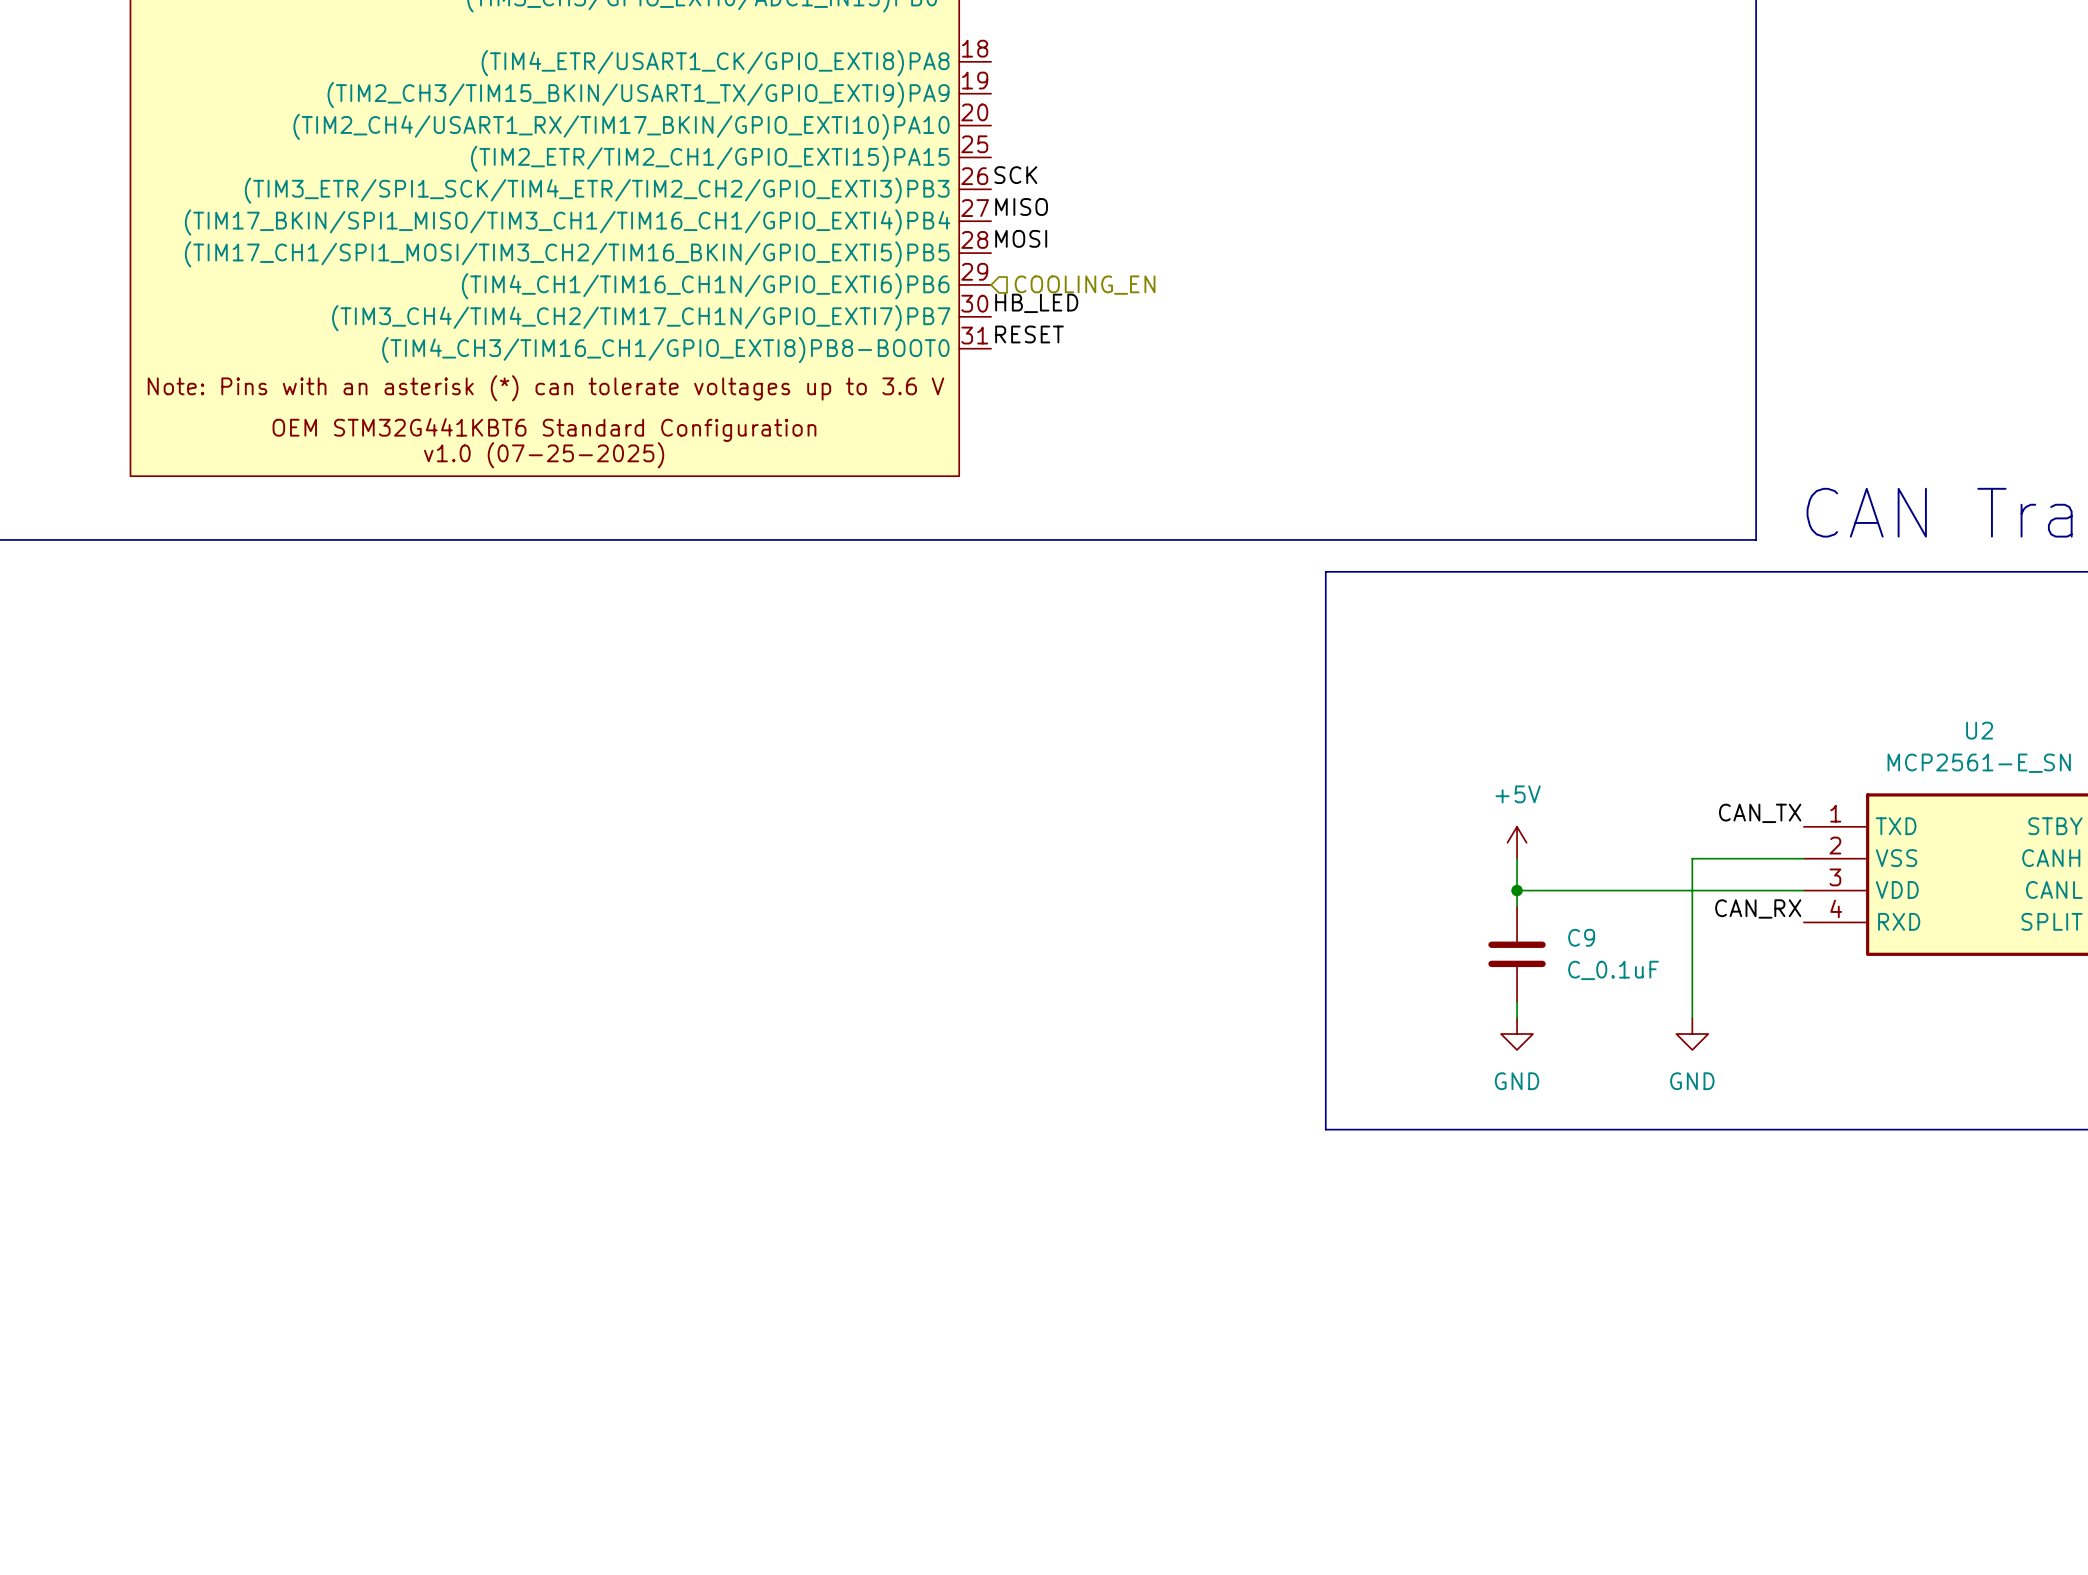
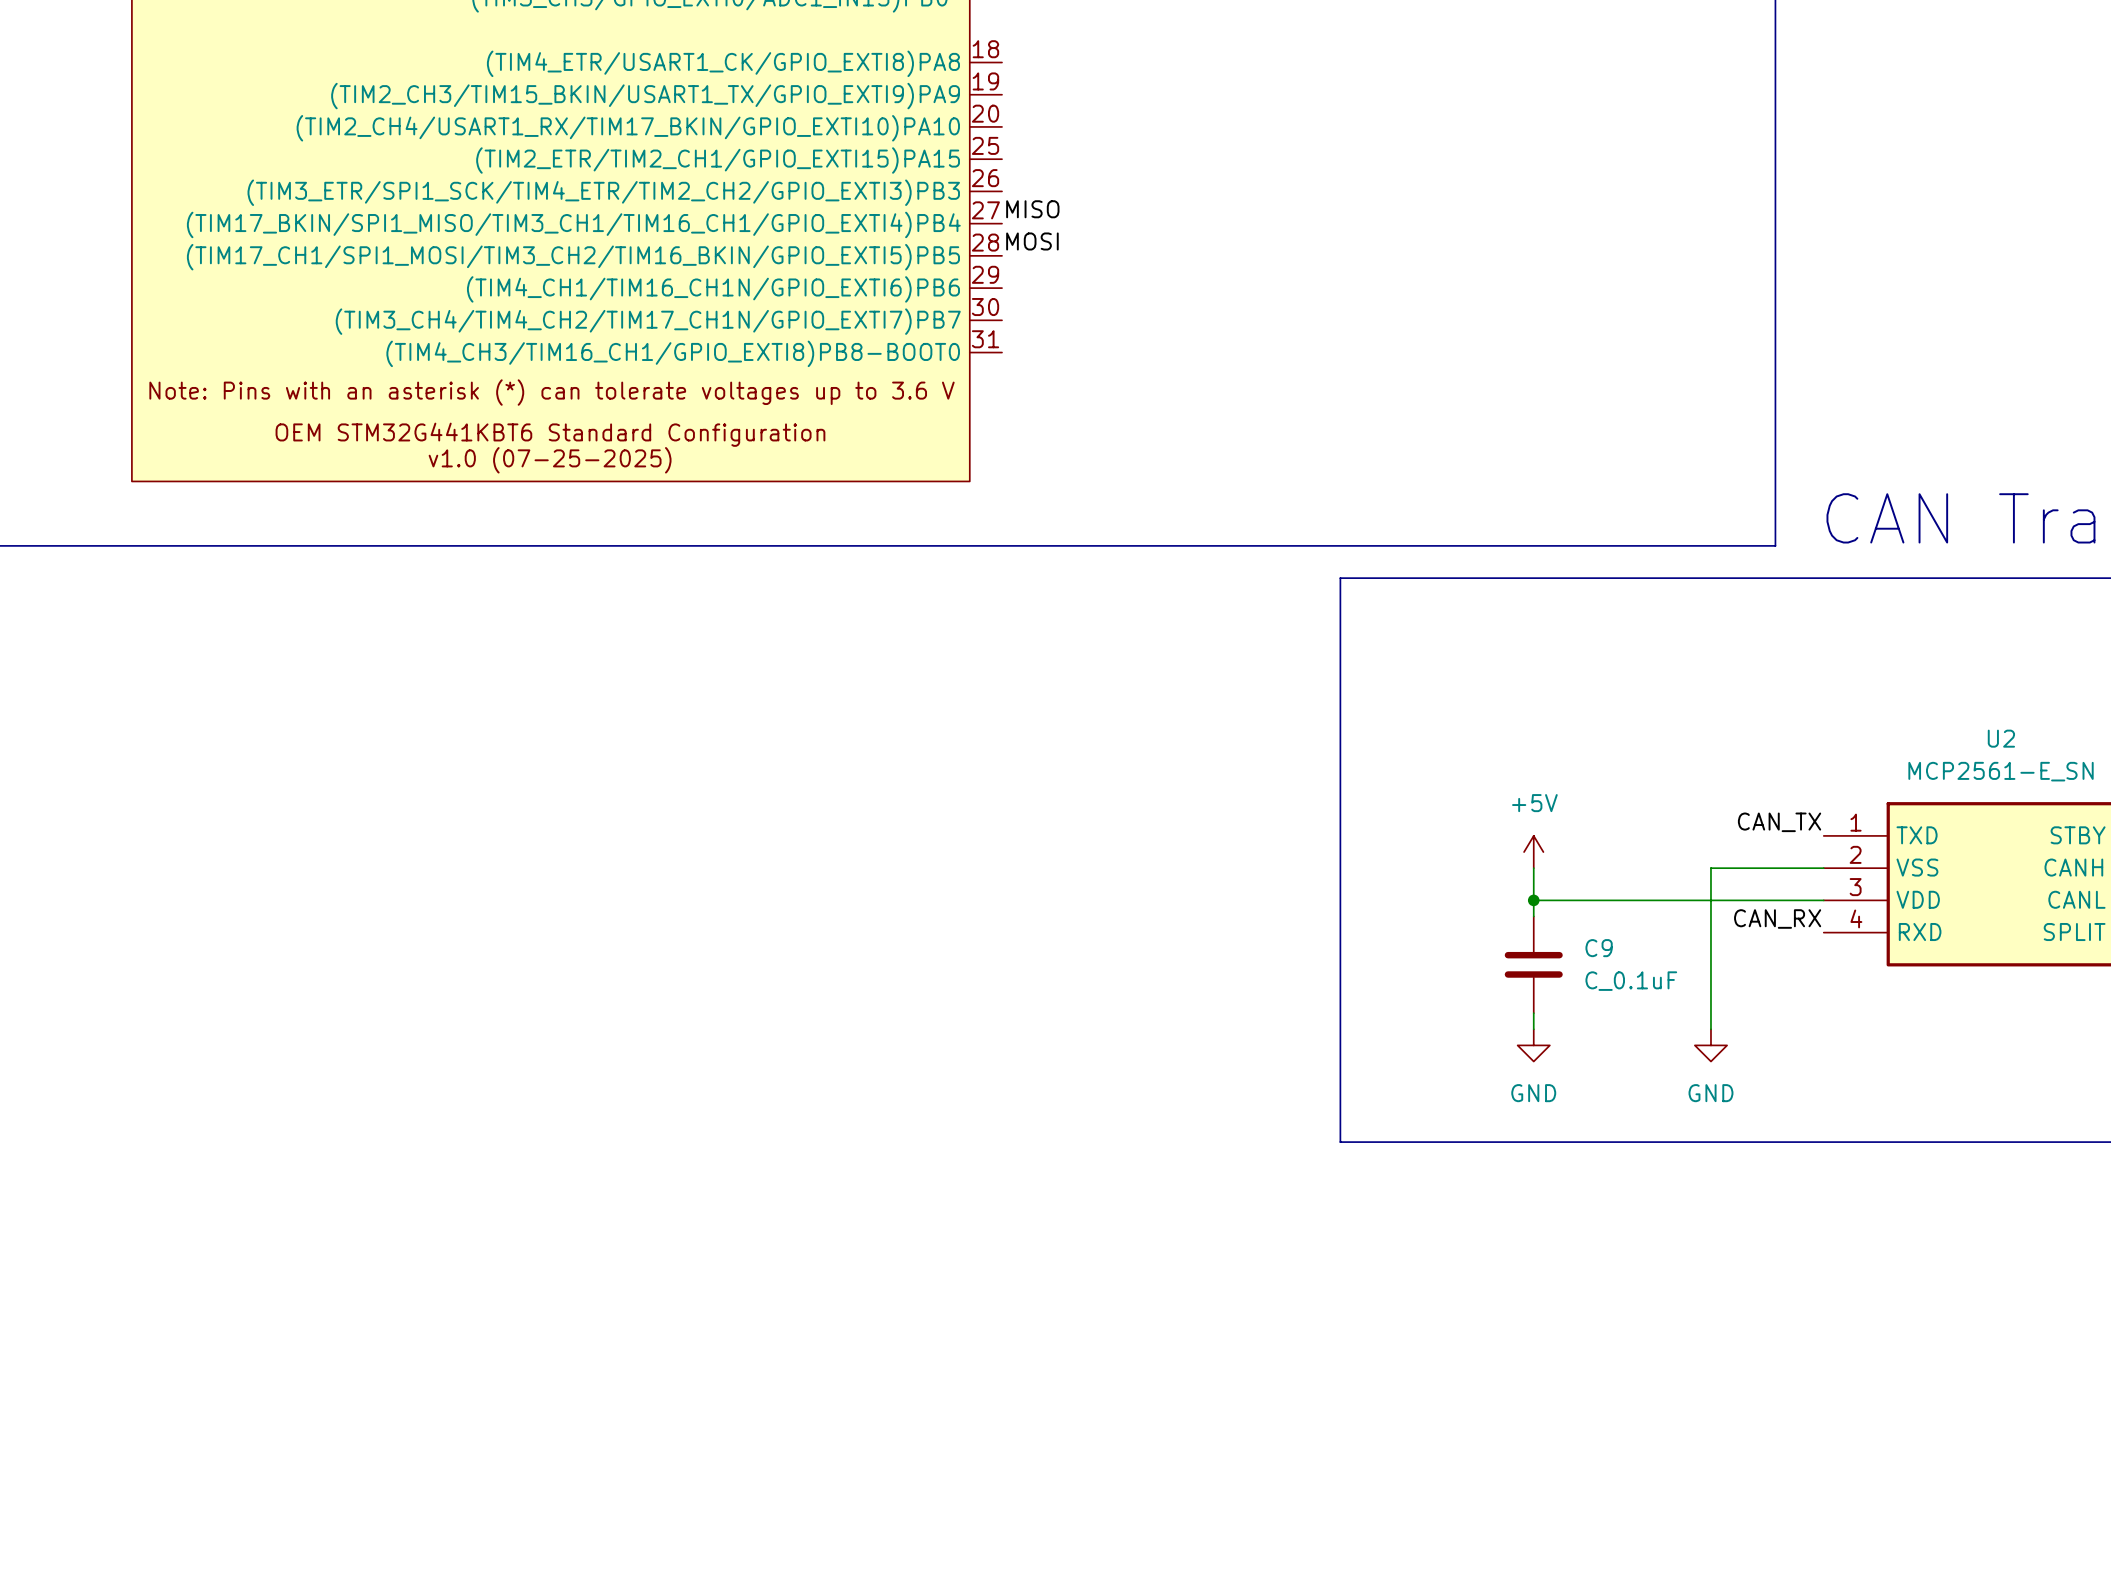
label: SCK (1015, 175) -> none
hierarchical label: COOLING_EN (1085, 285) -> none
label: HB_LED (1036, 303) -> none
label: RESET (1029, 334) -> none

